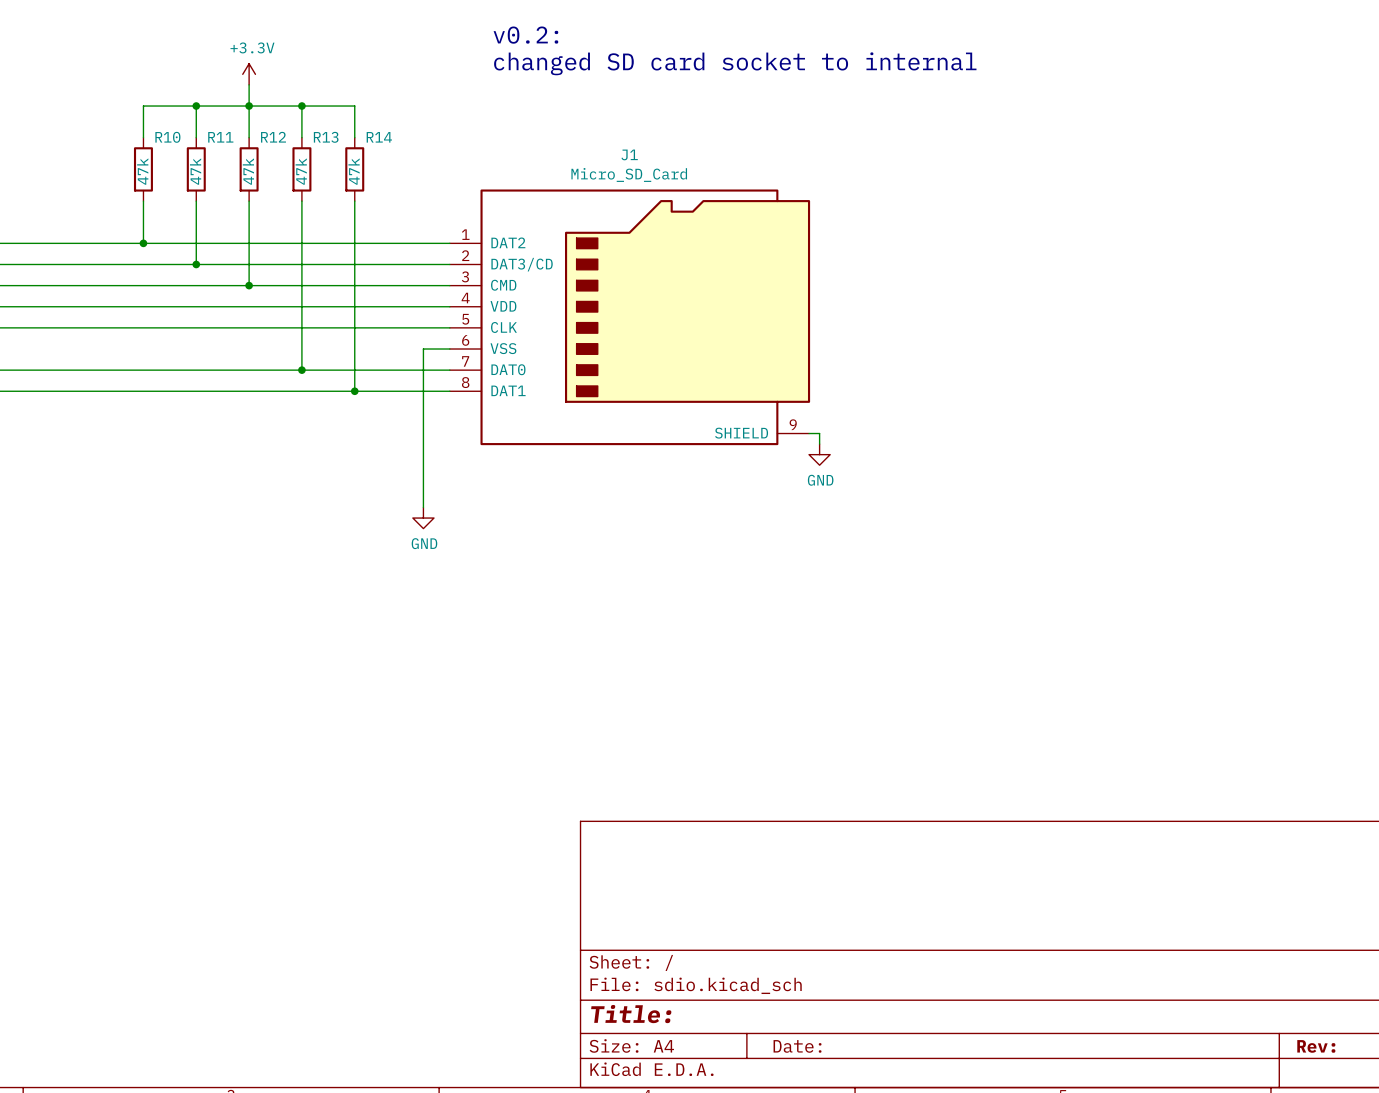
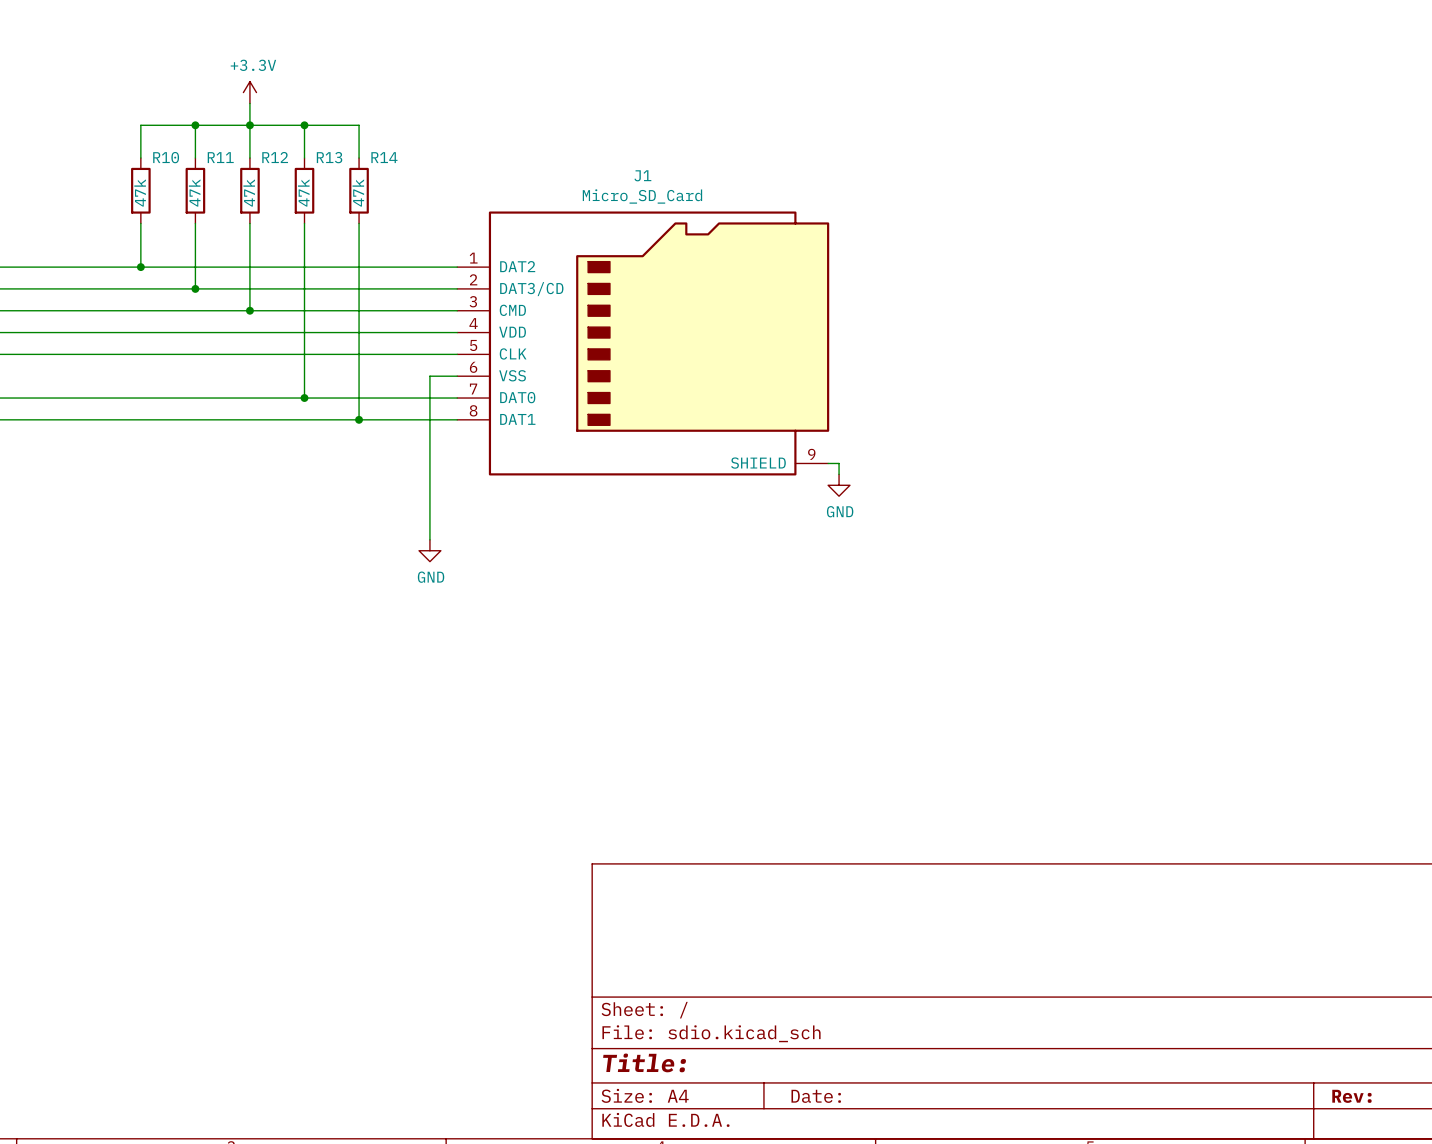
text: v0.2: (525, 35) -> none
text: changed SD card socket to internal (735, 63) -> none

